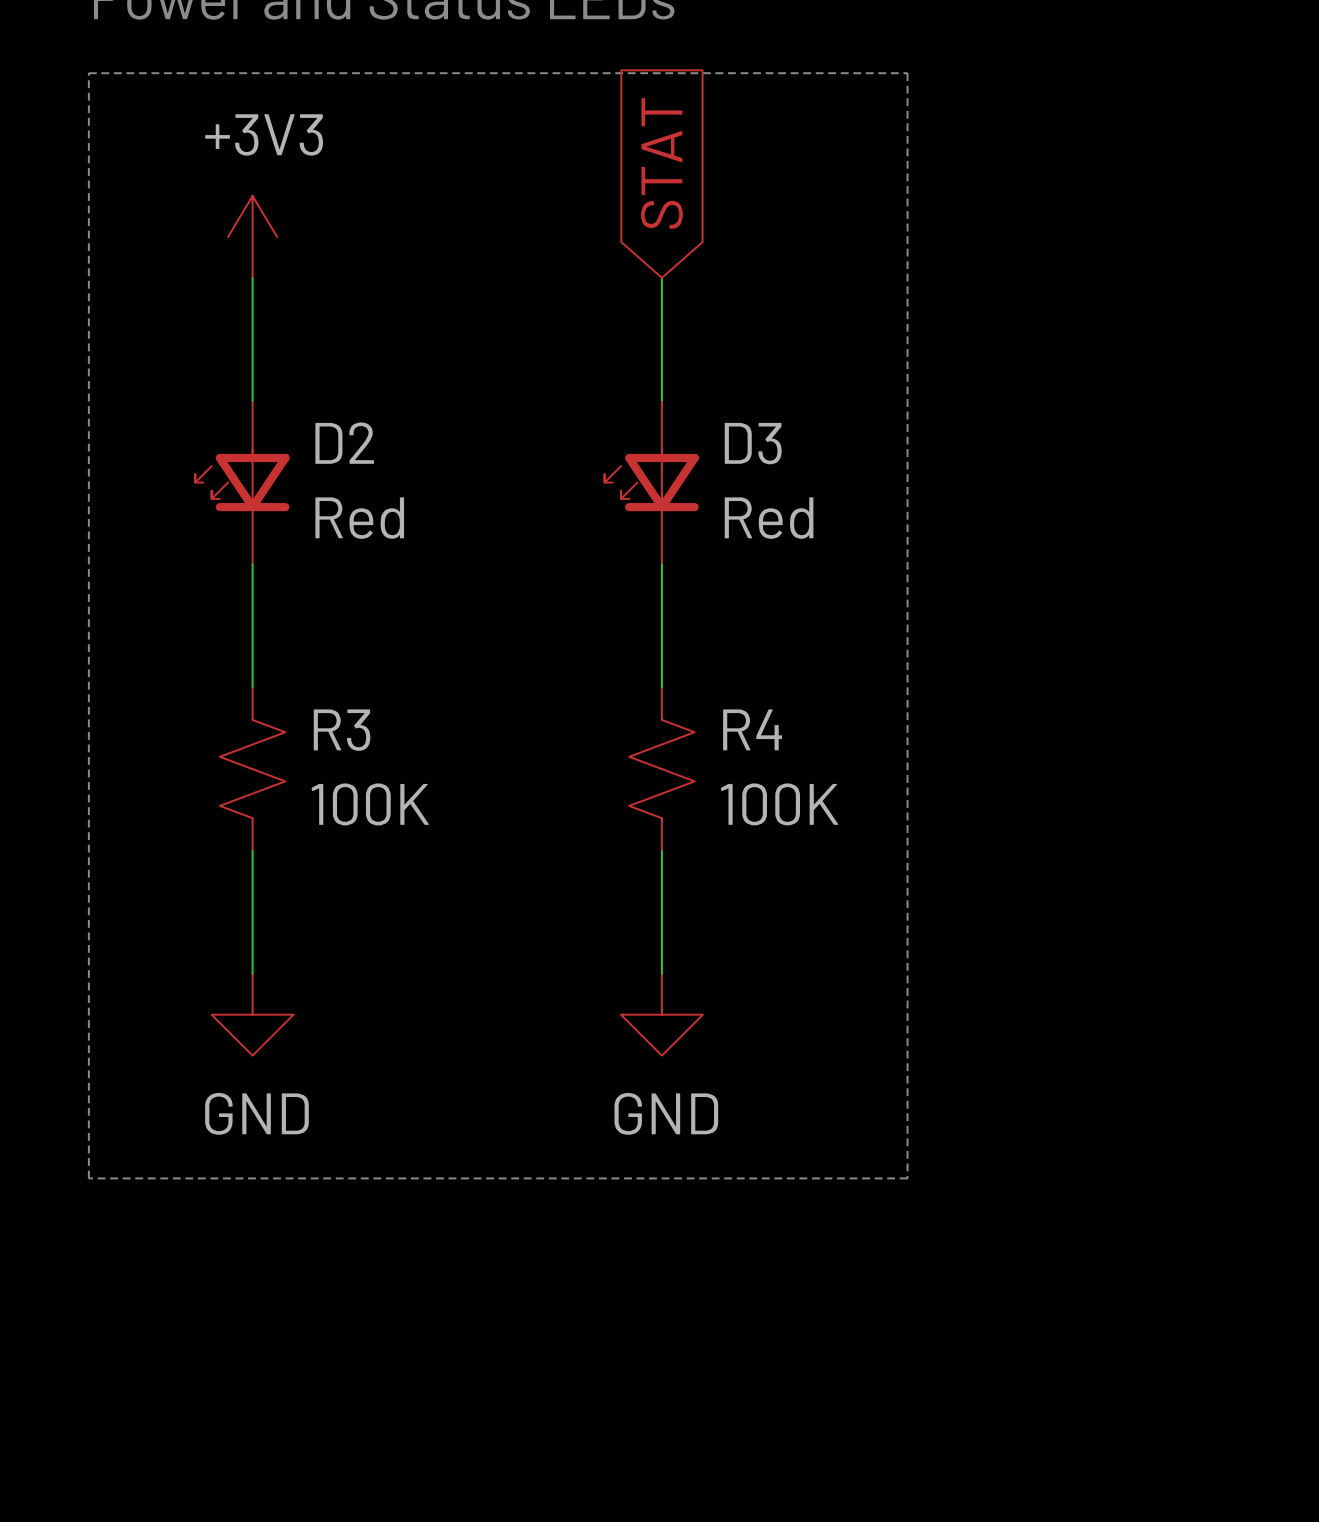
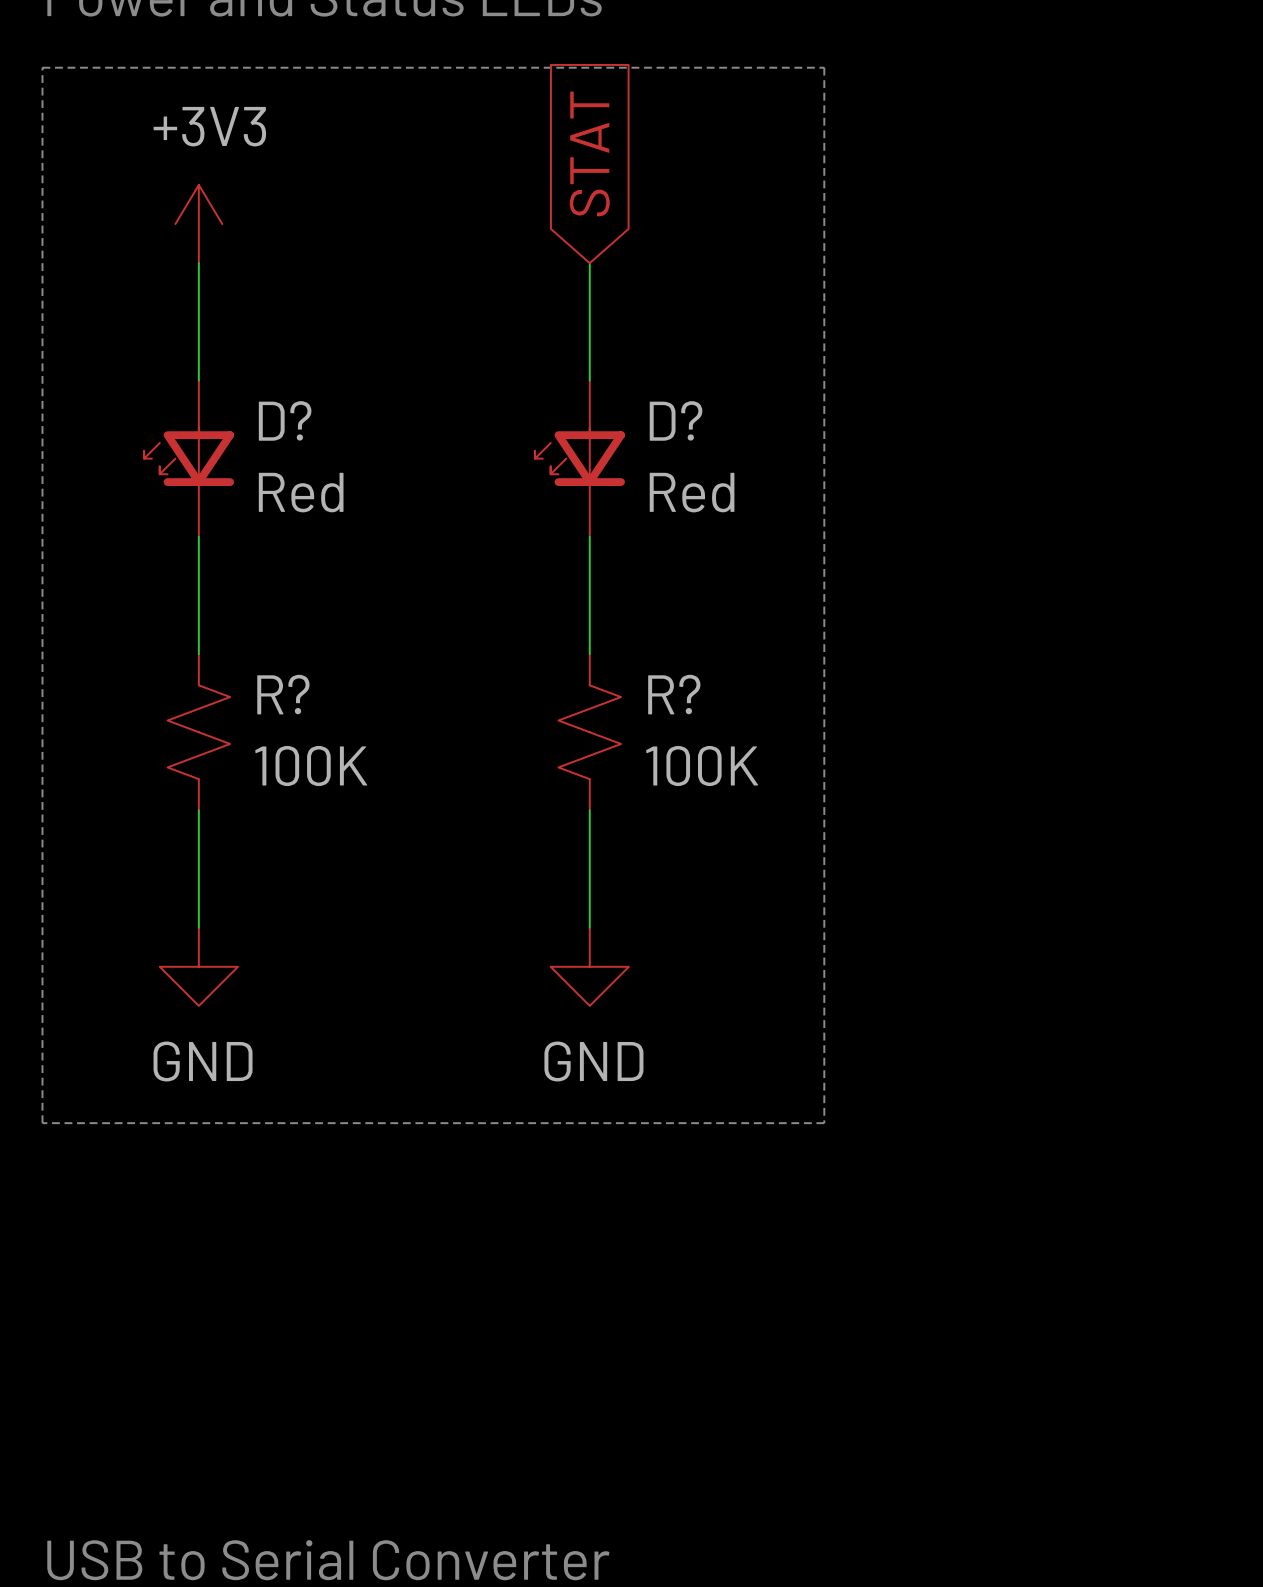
D2 name: D2 (344, 443) -> D? (285, 420)
D3 name: D3 (753, 443) -> D? (676, 420)
R4 name: R4 (752, 729) -> R? (674, 694)
R3 name: R3 (342, 730) -> R? (283, 694)

